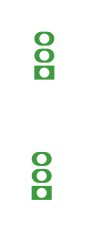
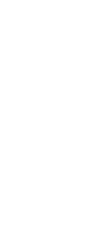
part: (44, 55) -> none
part: (41, 175) -> none

